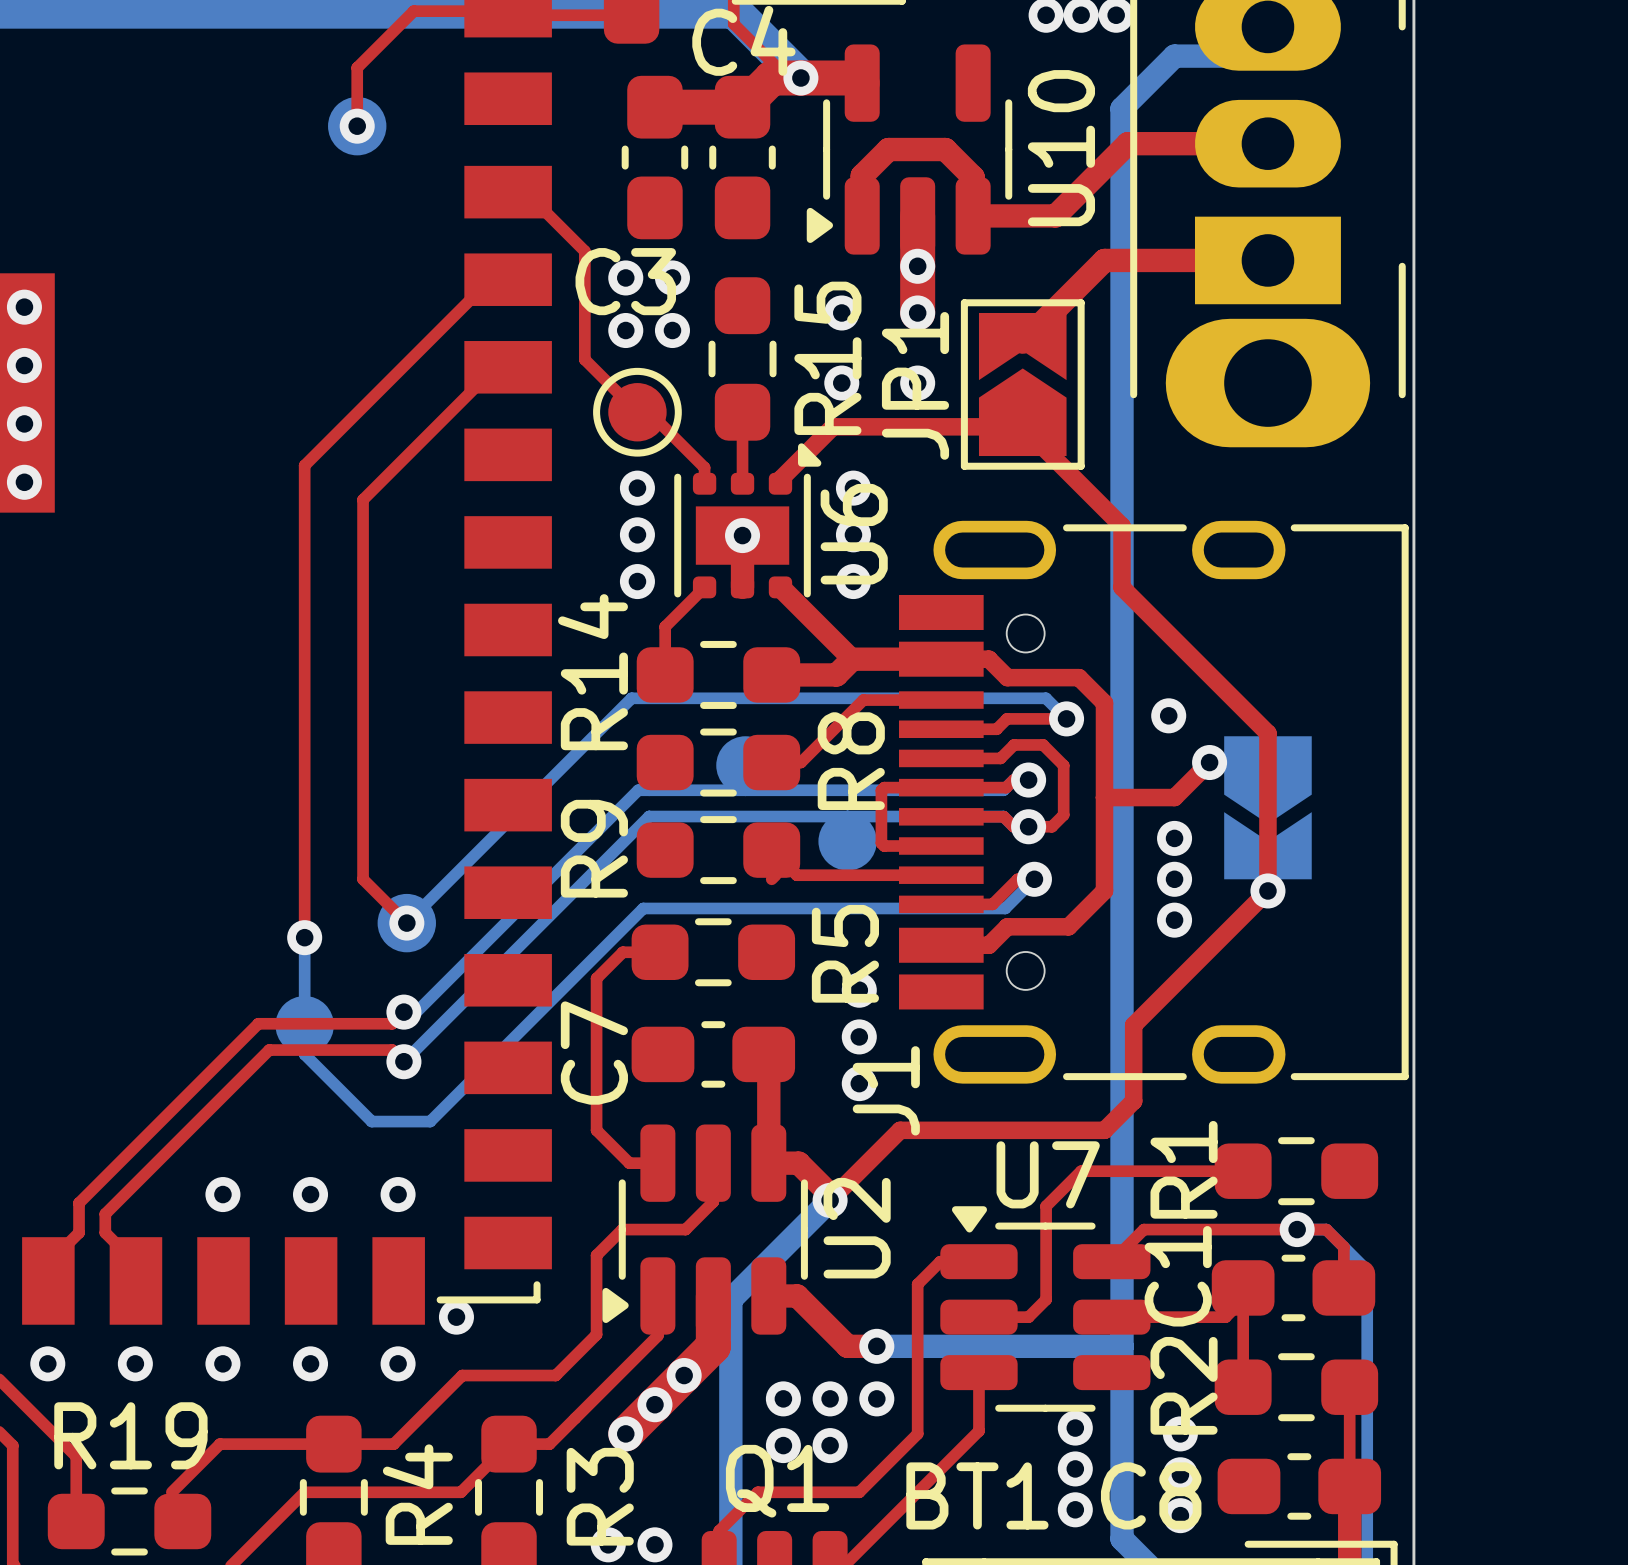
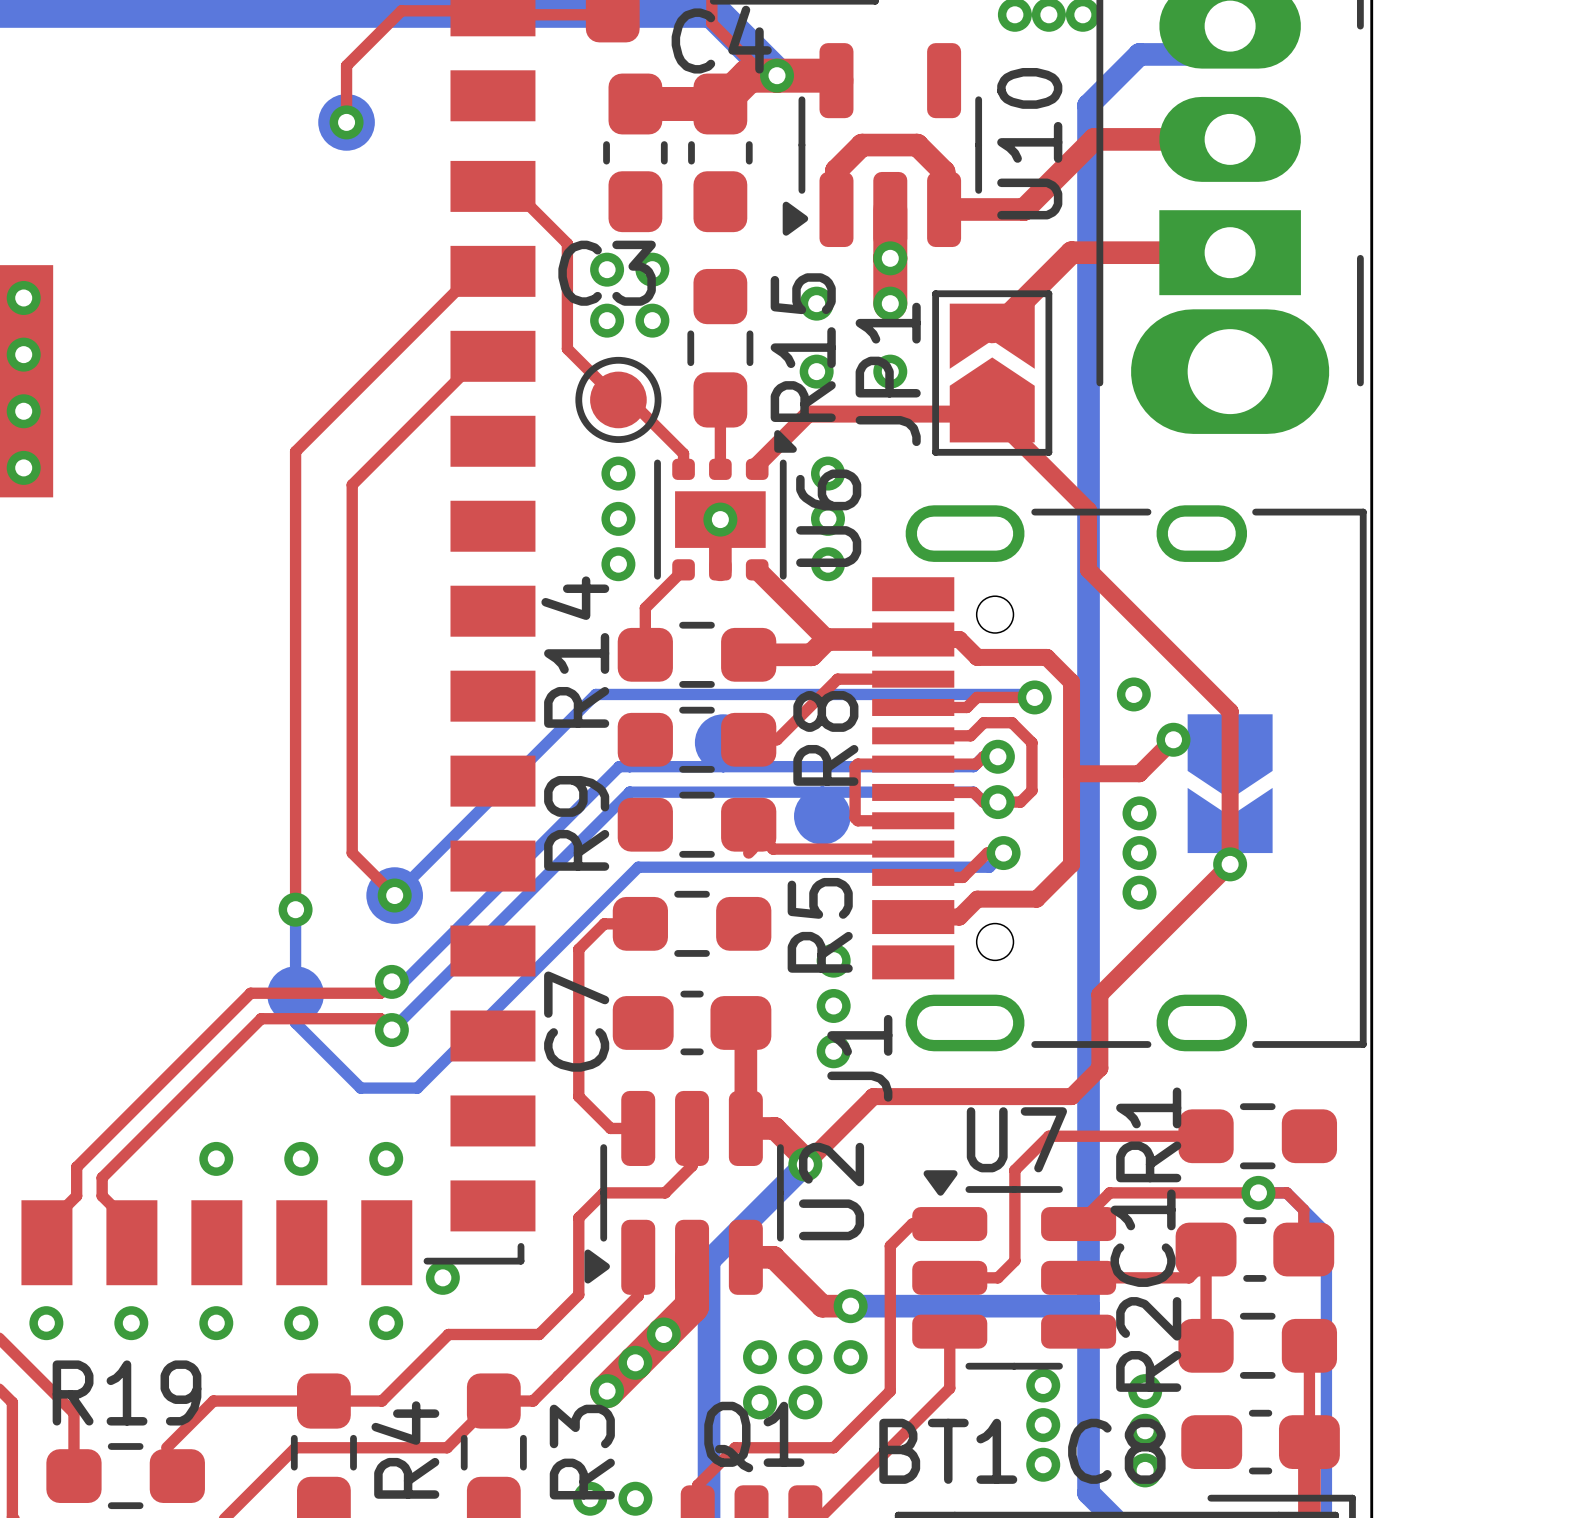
bottom track: (614, 715) (631, 698) (1045, 698) (1063, 715) -> (595, 694) (1031, 694)
bottom track: (1019, 893) (1005, 908) (643, 908) -> (989, 867) (638, 867) (624, 881)

